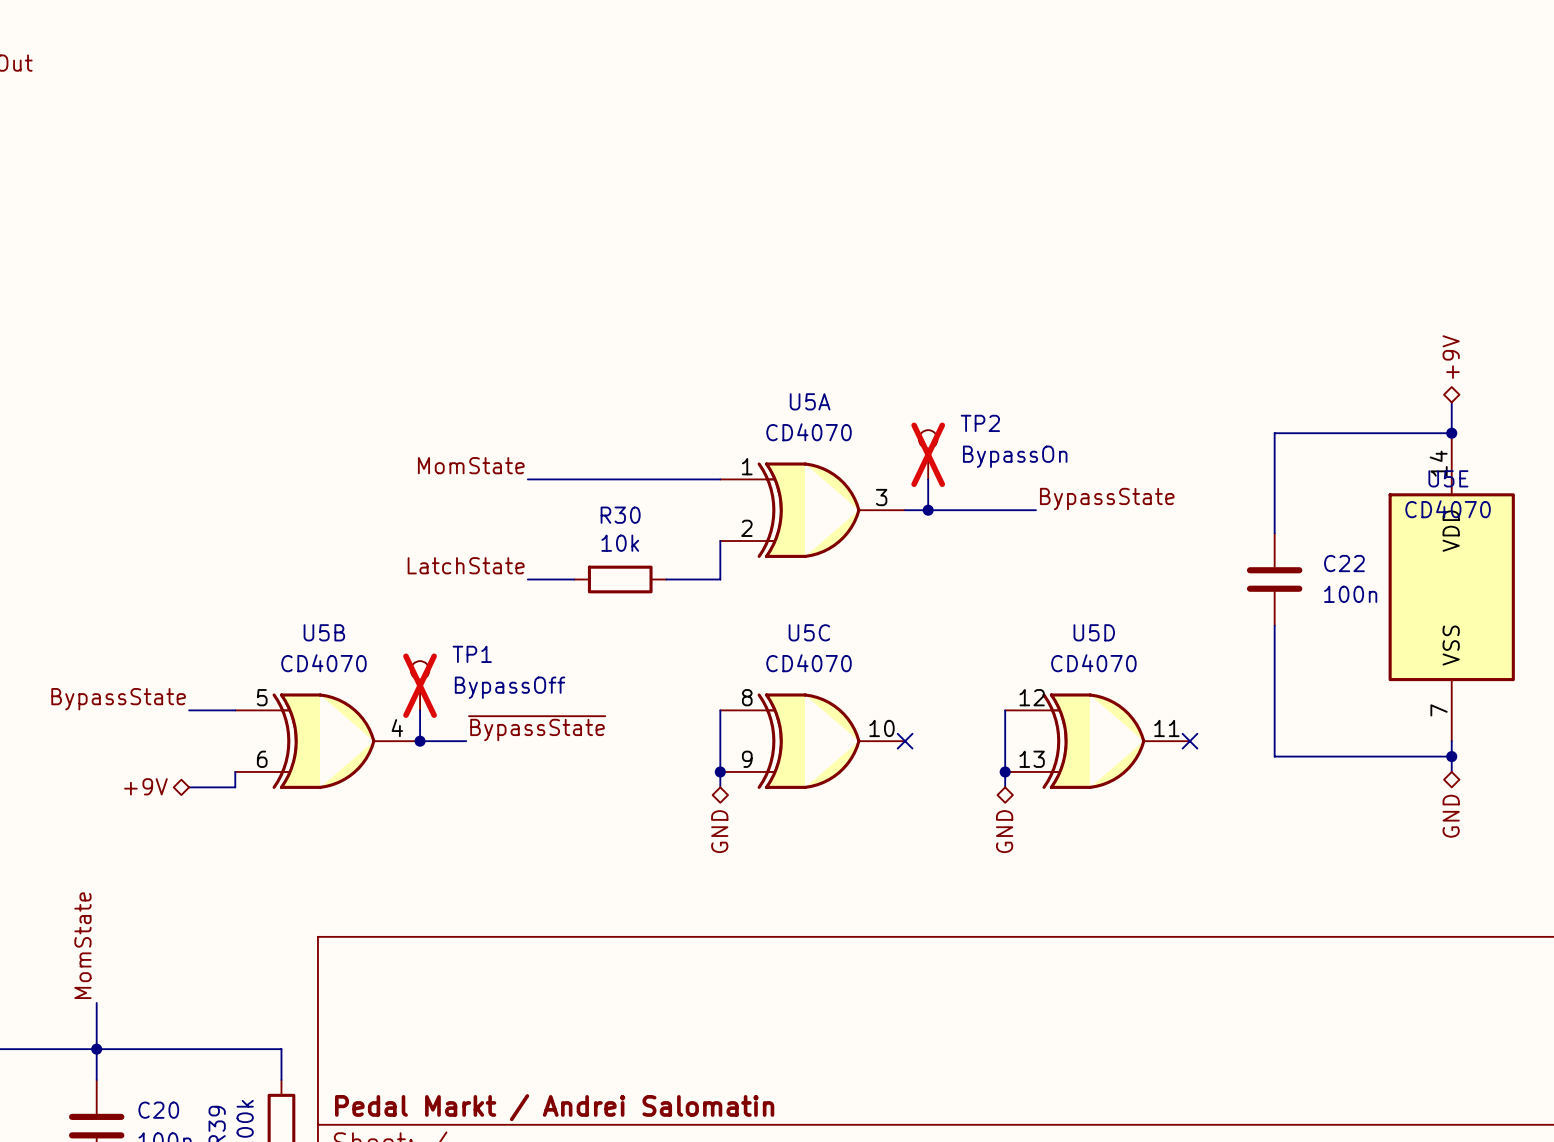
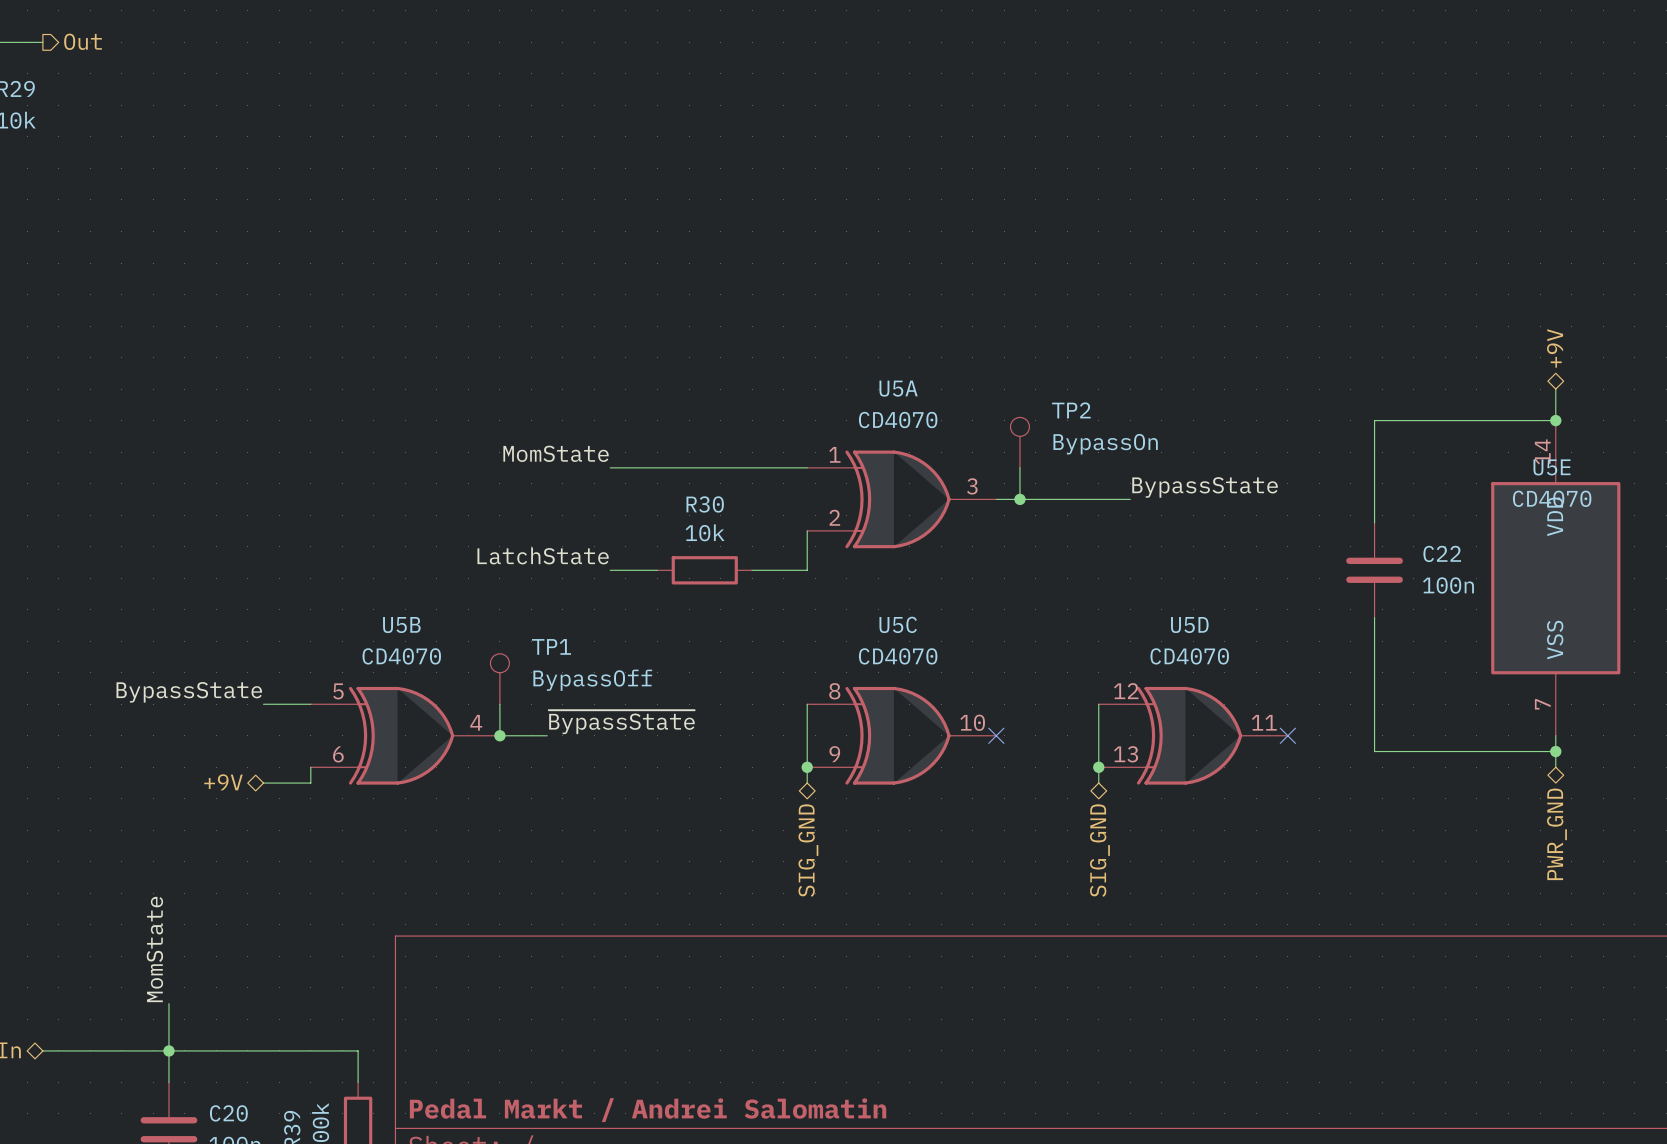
TP2 do-not-place cross: (928, 454) -> none
TP1 do-not-place cross: (420, 685) -> none
hierarchical label: GND (1451, 816) -> PWR_GND (1556, 834)
hierarchical label: GND (719, 831) -> SIG_GND (808, 850)
hierarchical label: GND (1004, 831) -> SIG_GND (1099, 850)

